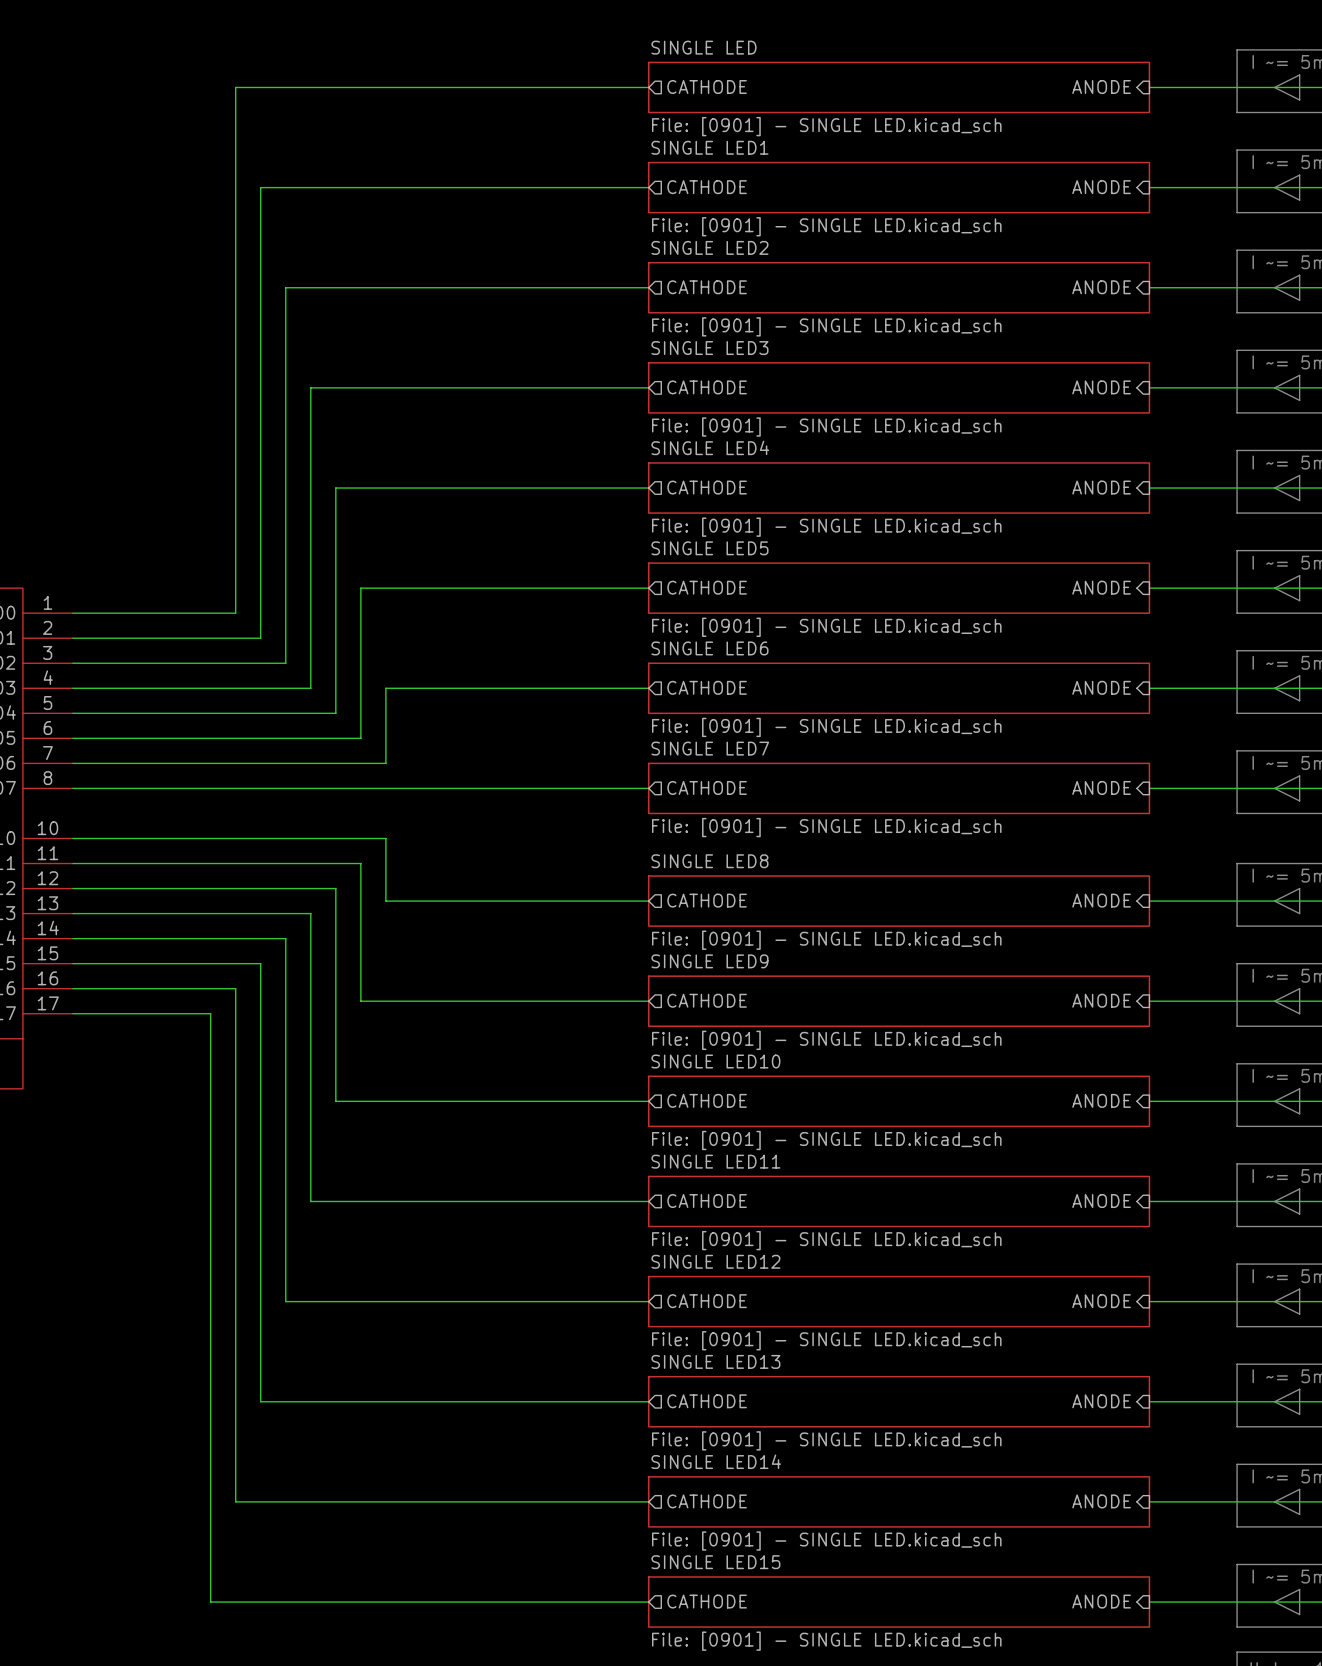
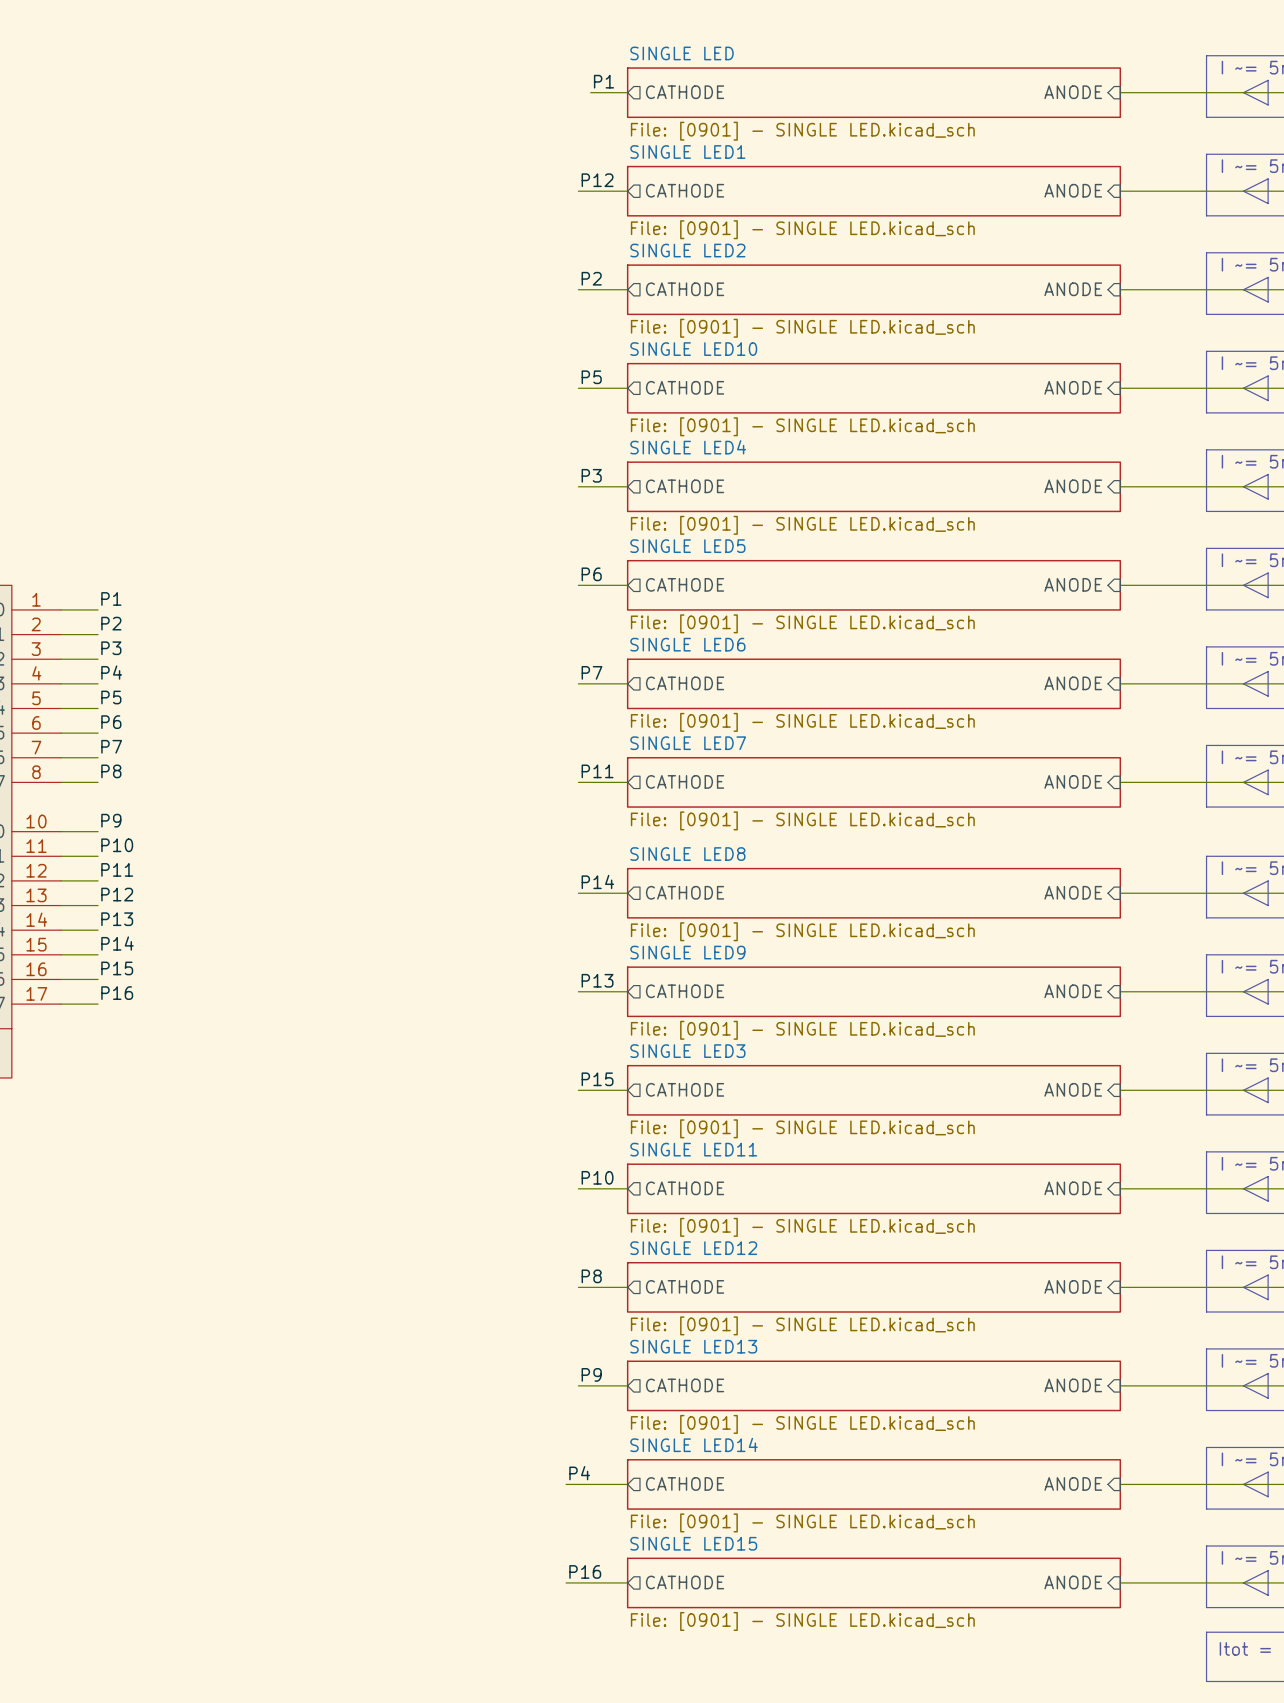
label: none -> P1 (604, 81)
wire: (611, 87) (235, 87) (235, 613) (110, 613) -> none
label: none -> P12 (597, 180)
wire: (598, 187) (260, 187) (260, 638) (110, 638) -> none
label: none -> P2 (591, 278)
wire: (598, 287) (285, 287) (285, 663) (110, 663) -> none
sheet SINGLE LED3 name: SINGLE LED3 (709, 348) -> SINGLE LED10 (693, 349)
label: none -> P5 (591, 377)
wire: (598, 387) (310, 387) (310, 688) (110, 688) -> none
label: none -> P3 (591, 475)
wire: (598, 488) (335, 488) (335, 713) (110, 713) -> none
label: none -> P6 (591, 574)
wire: (598, 588) (360, 588) (360, 738) (110, 738) -> none
label: none -> P1 (111, 598)
label: none -> P2 (111, 623)
label: none -> P3 (111, 648)
label: none -> P4 (111, 672)
label: none -> P7 (591, 672)
wire: (598, 688) (385, 688) (385, 763) (110, 763) -> none
label: none -> P5 (111, 697)
label: none -> P6 (111, 722)
label: none -> P7 (111, 746)
label: none -> P8 (111, 771)
label: none -> P11 (597, 771)
wire: (110, 788) (598, 788) -> none
label: none -> P9 (111, 820)
wire: (110, 838) (385, 838) (385, 901) (598, 901) -> none
label: none -> P10 (117, 845)
wire: (110, 863) (360, 863) (360, 1001) (598, 1001) -> none
label: none -> P11 (117, 869)
wire: (110, 888) (335, 888) (335, 1101) (598, 1101) -> none
label: none -> P14 (597, 881)
label: none -> P12 (117, 894)
wire: (110, 913) (310, 913) (310, 1201) (598, 1201) -> none
label: none -> P13 (117, 919)
wire: (110, 938) (285, 938) (285, 1301) (598, 1301) -> none
label: none -> P14 (117, 943)
wire: (110, 963) (260, 963) (260, 1401) (598, 1401) -> none
label: none -> P15 (117, 968)
wire: (110, 988) (235, 988) (235, 1501) (586, 1501) -> none
label: none -> P13 (597, 980)
label: none -> P16 (117, 993)
wire: (110, 1013) (210, 1013) (210, 1602) (586, 1602) -> none
sheet SINGLE LED10 name: SINGLE LED10 (715, 1061) -> SINGLE LED3 (687, 1051)
label: none -> P15 (597, 1079)
label: none -> P10 (597, 1177)
label: none -> P8 (591, 1276)
label: none -> P9 (591, 1374)
label: none -> P4 (579, 1473)
label: none -> P16 (585, 1571)

